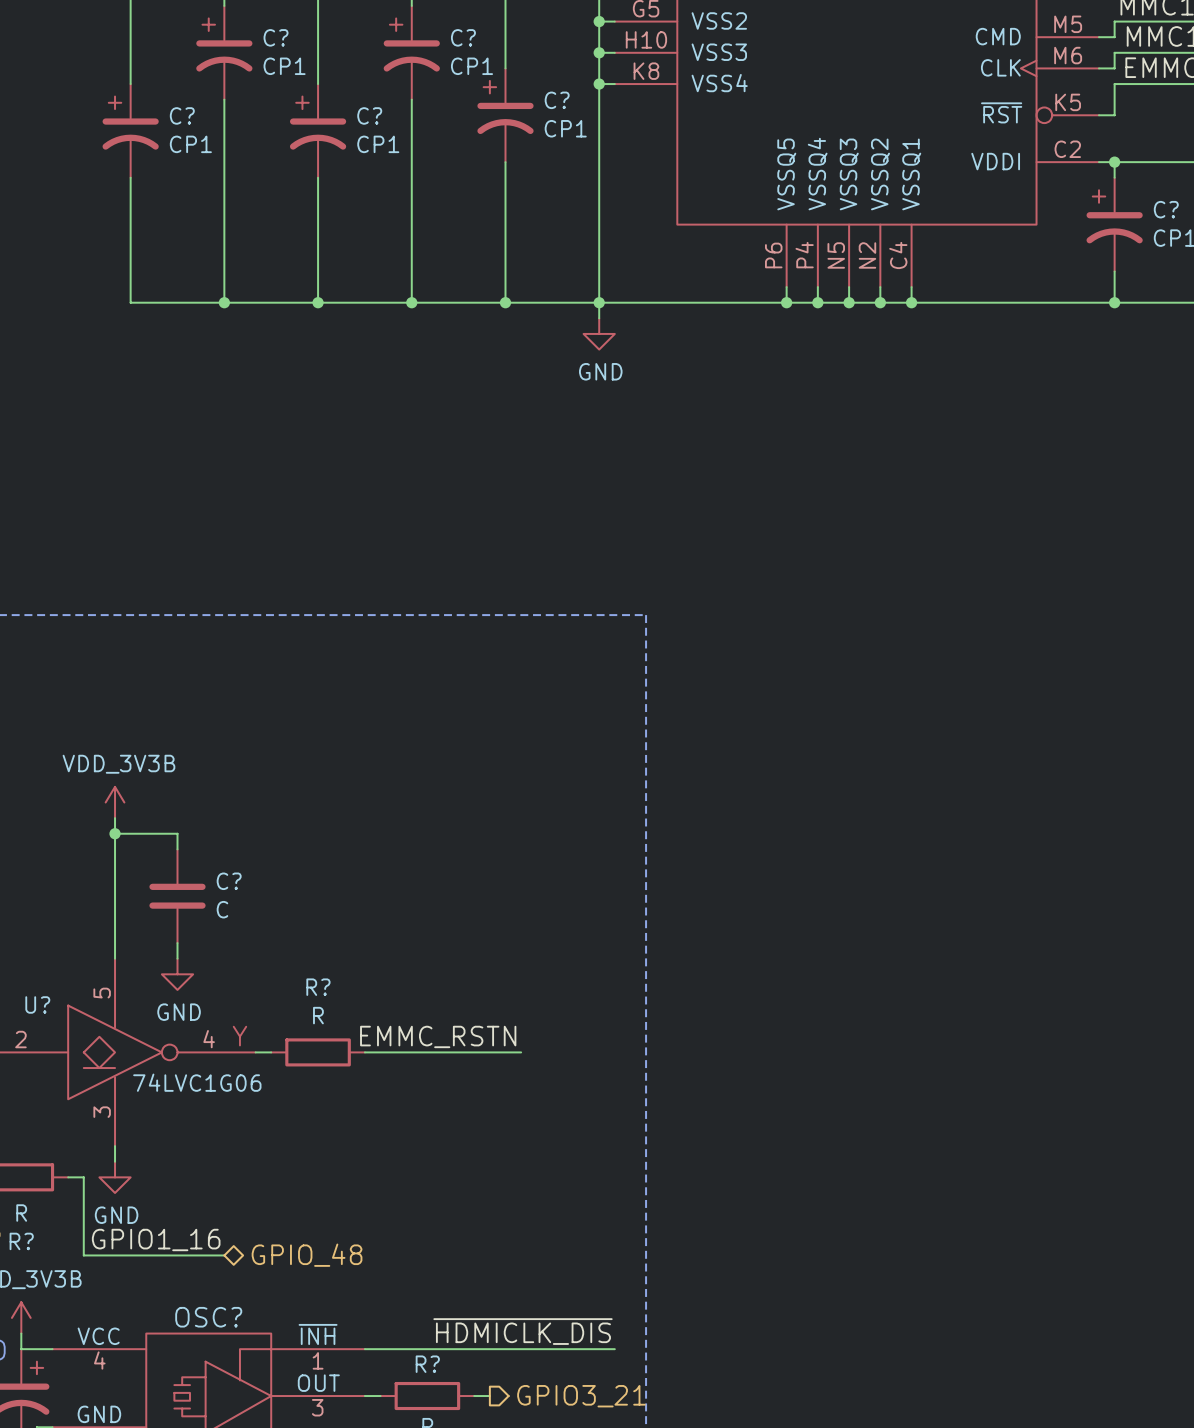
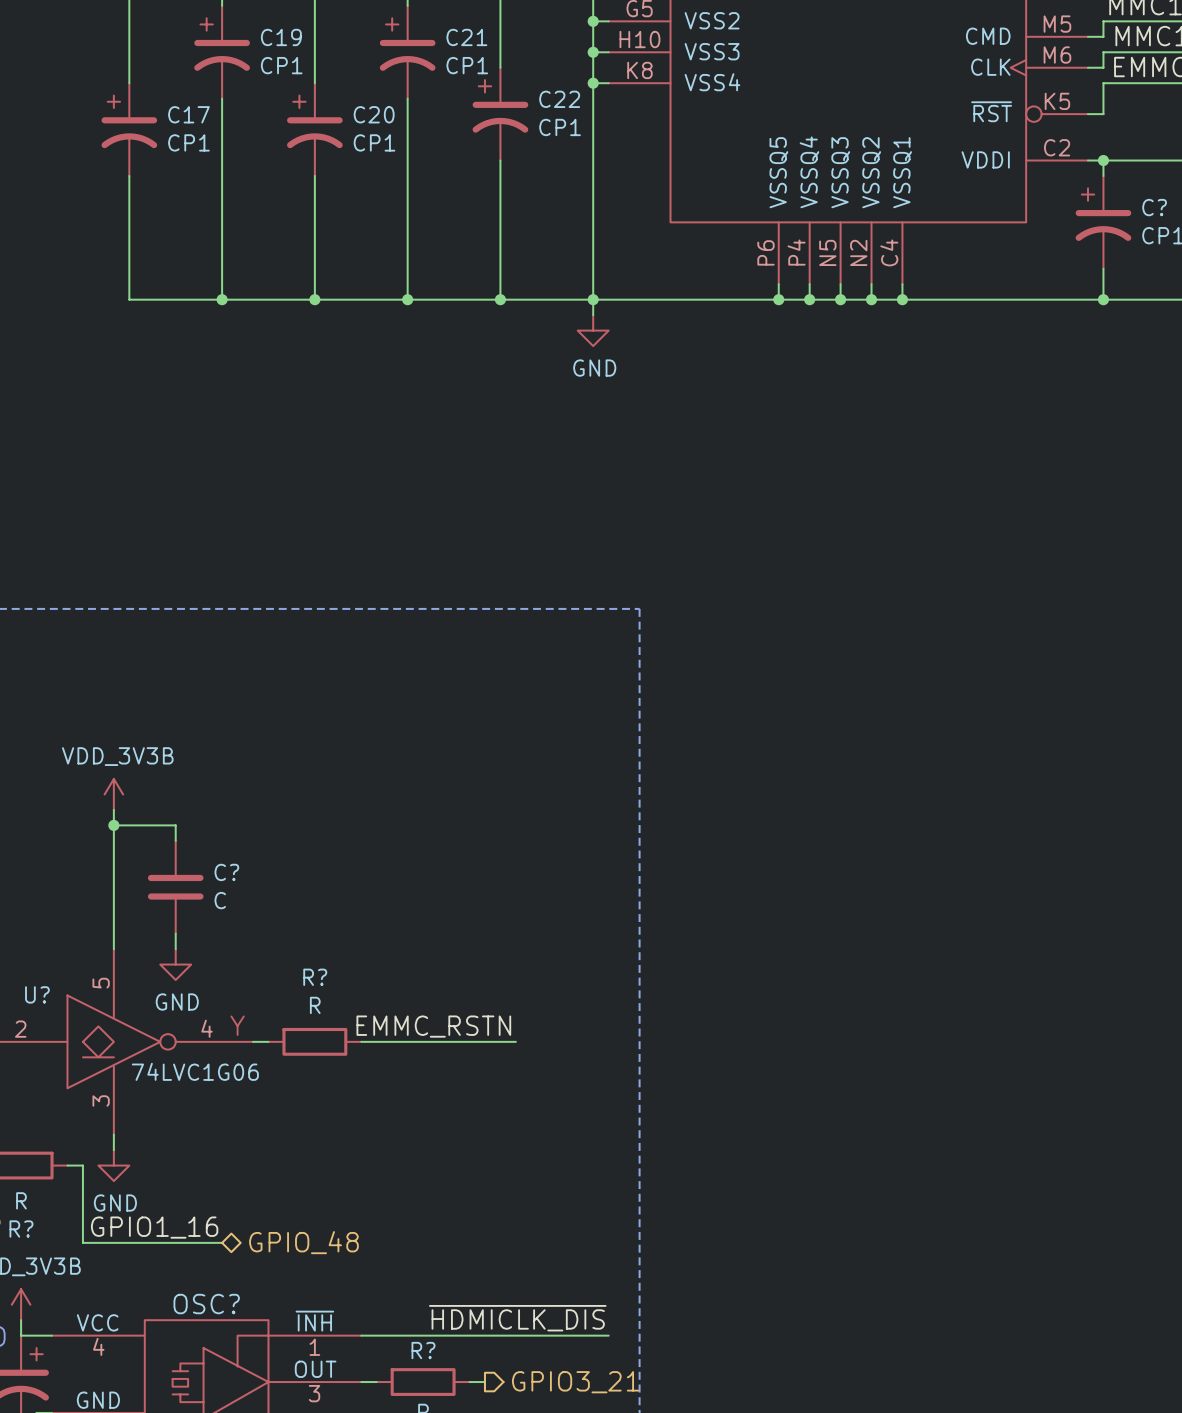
C? name: C? (276, 37) -> C19 (281, 37)
C? name: C? (463, 37) -> C21 (466, 37)
C? name: C? (557, 100) -> C22 (559, 99)
C? name: C? (182, 115) -> C17 (188, 114)
C? name: C? (369, 115) -> C20 (374, 114)

